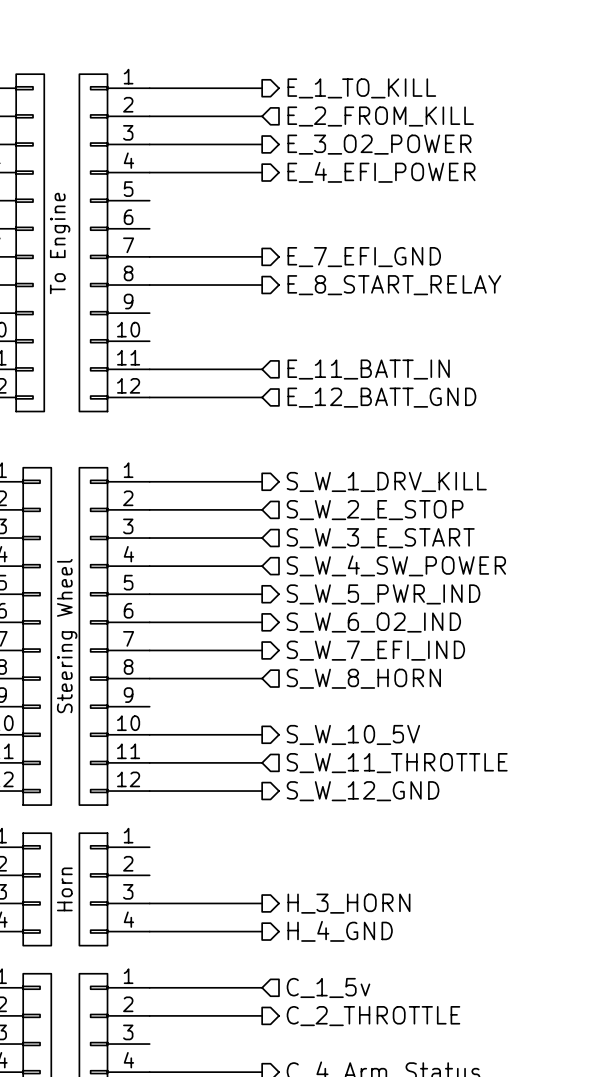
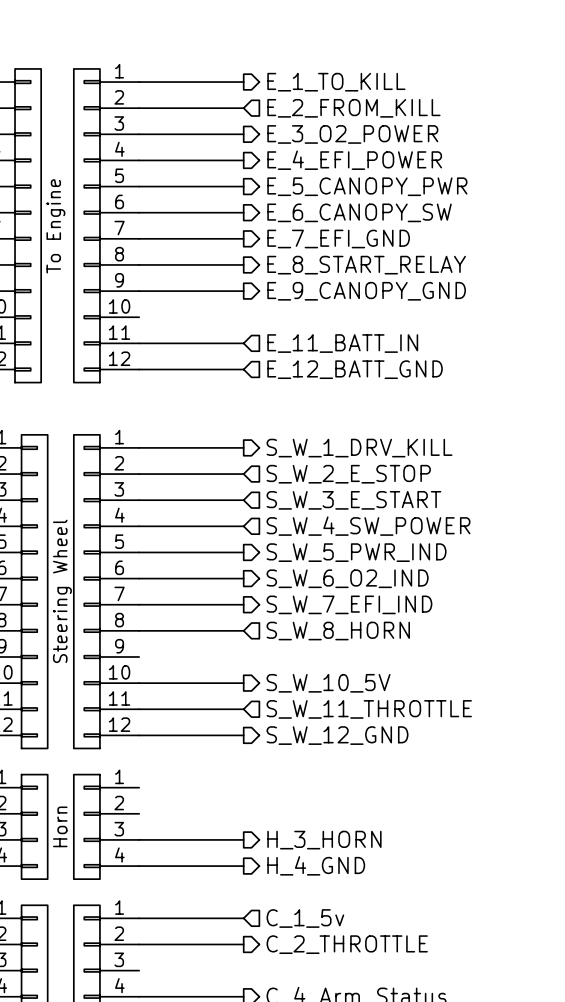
wire: none -> (139, 186) (243, 186)
hierarchical label: none -> E_5_CANOPY_PWR (367, 186)
wire: none -> (139, 212) (243, 212)
hierarchical label: none -> E_6_CANOPY_SW (359, 212)
wire: none -> (139, 291) (243, 291)
hierarchical label: none -> E_9_CANOPY_GND (366, 291)

